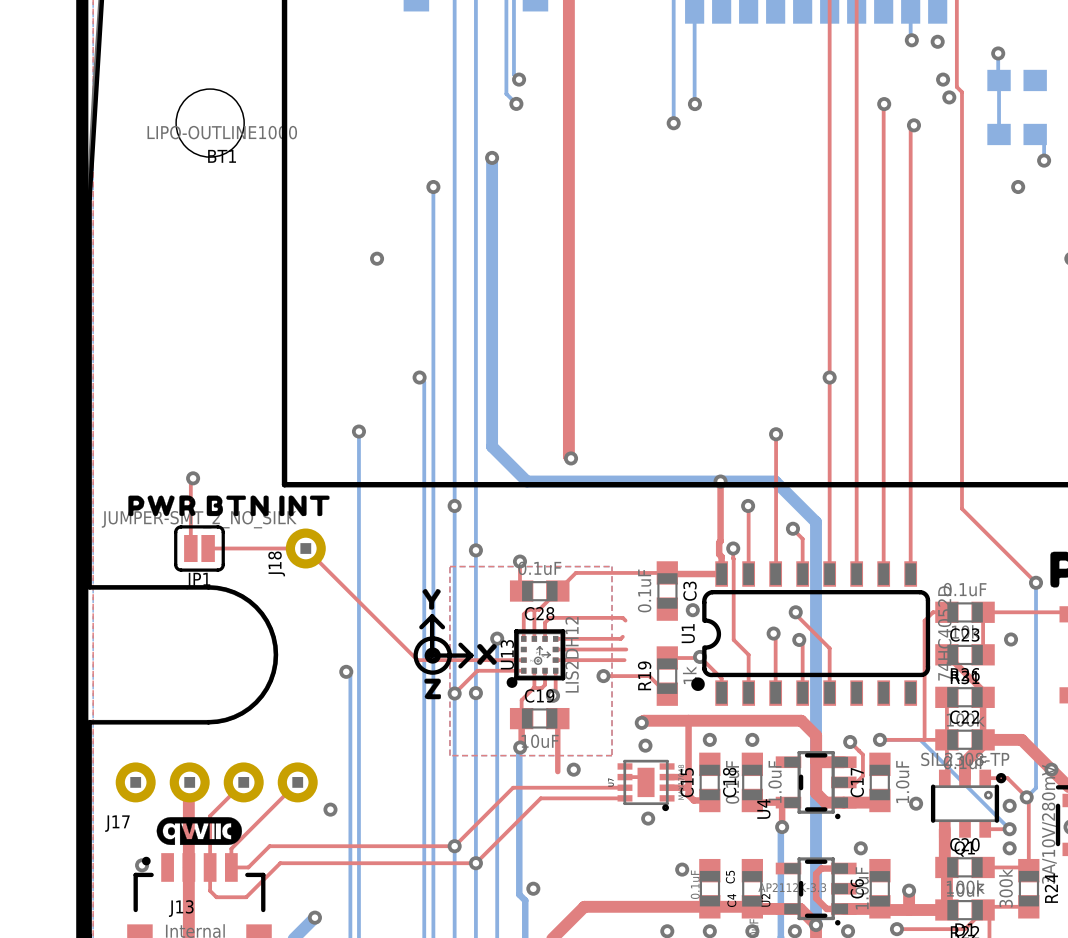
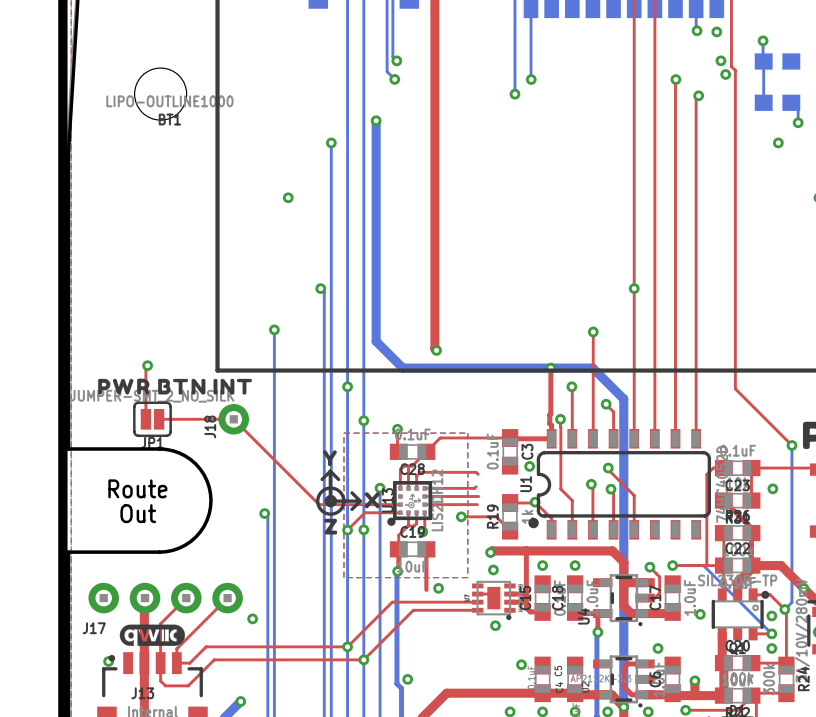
text: none -> Route (137, 488)
text: none -> Out (138, 513)

